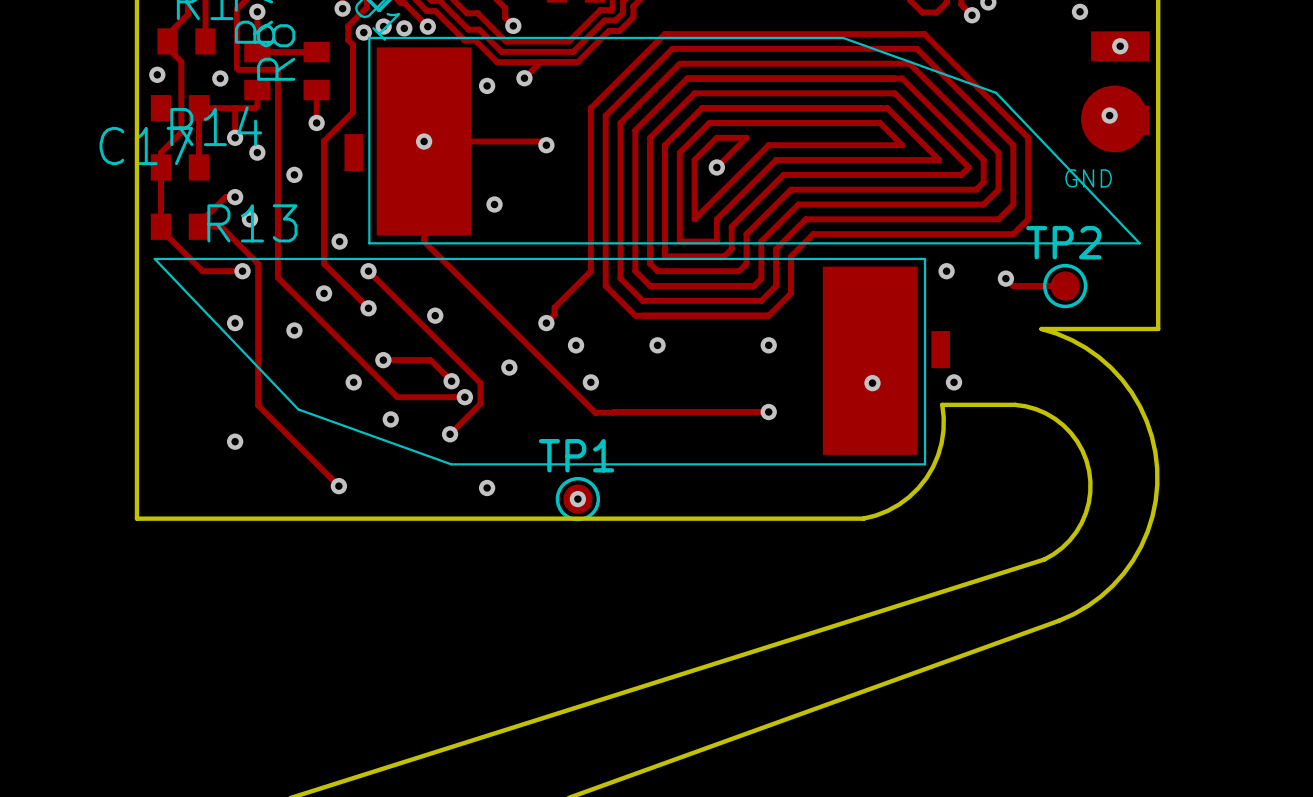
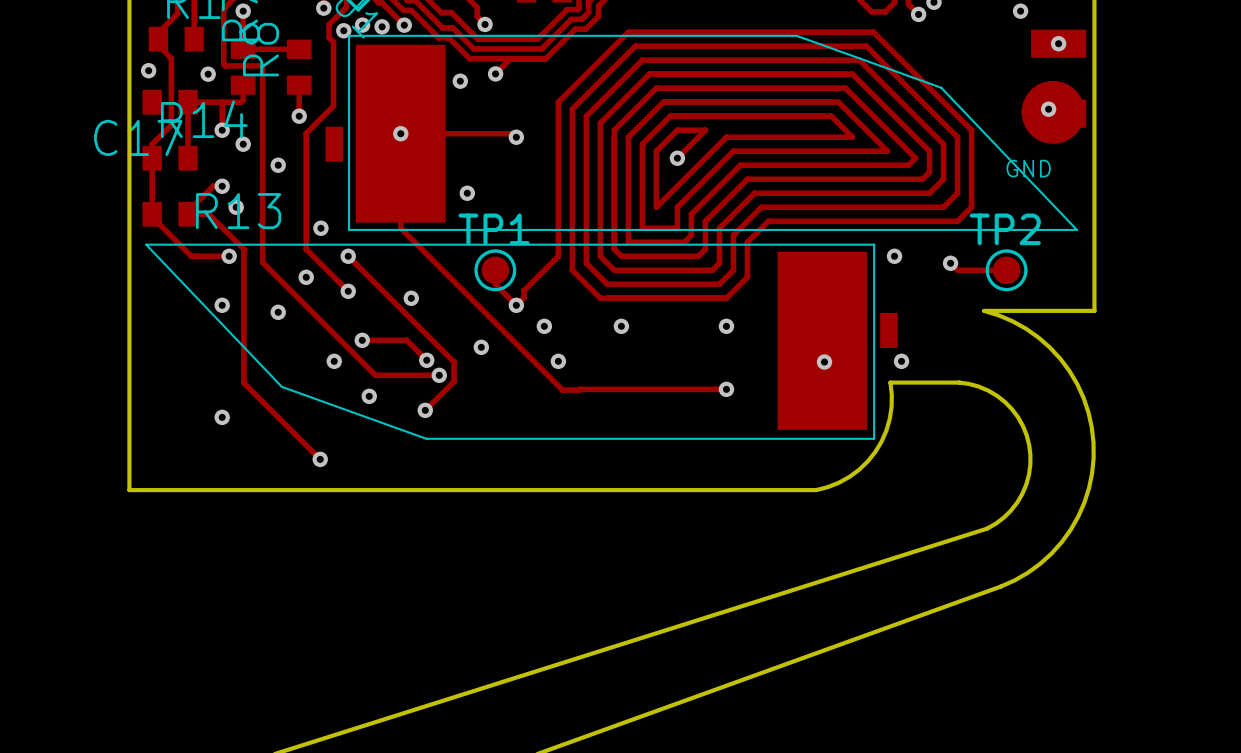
track: none -> (495, 270) (495, 284) (516, 305)
via: (487, 487) -> none
TP1 position: (577, 499) -> (495, 270)
via: (577, 499) -> none

